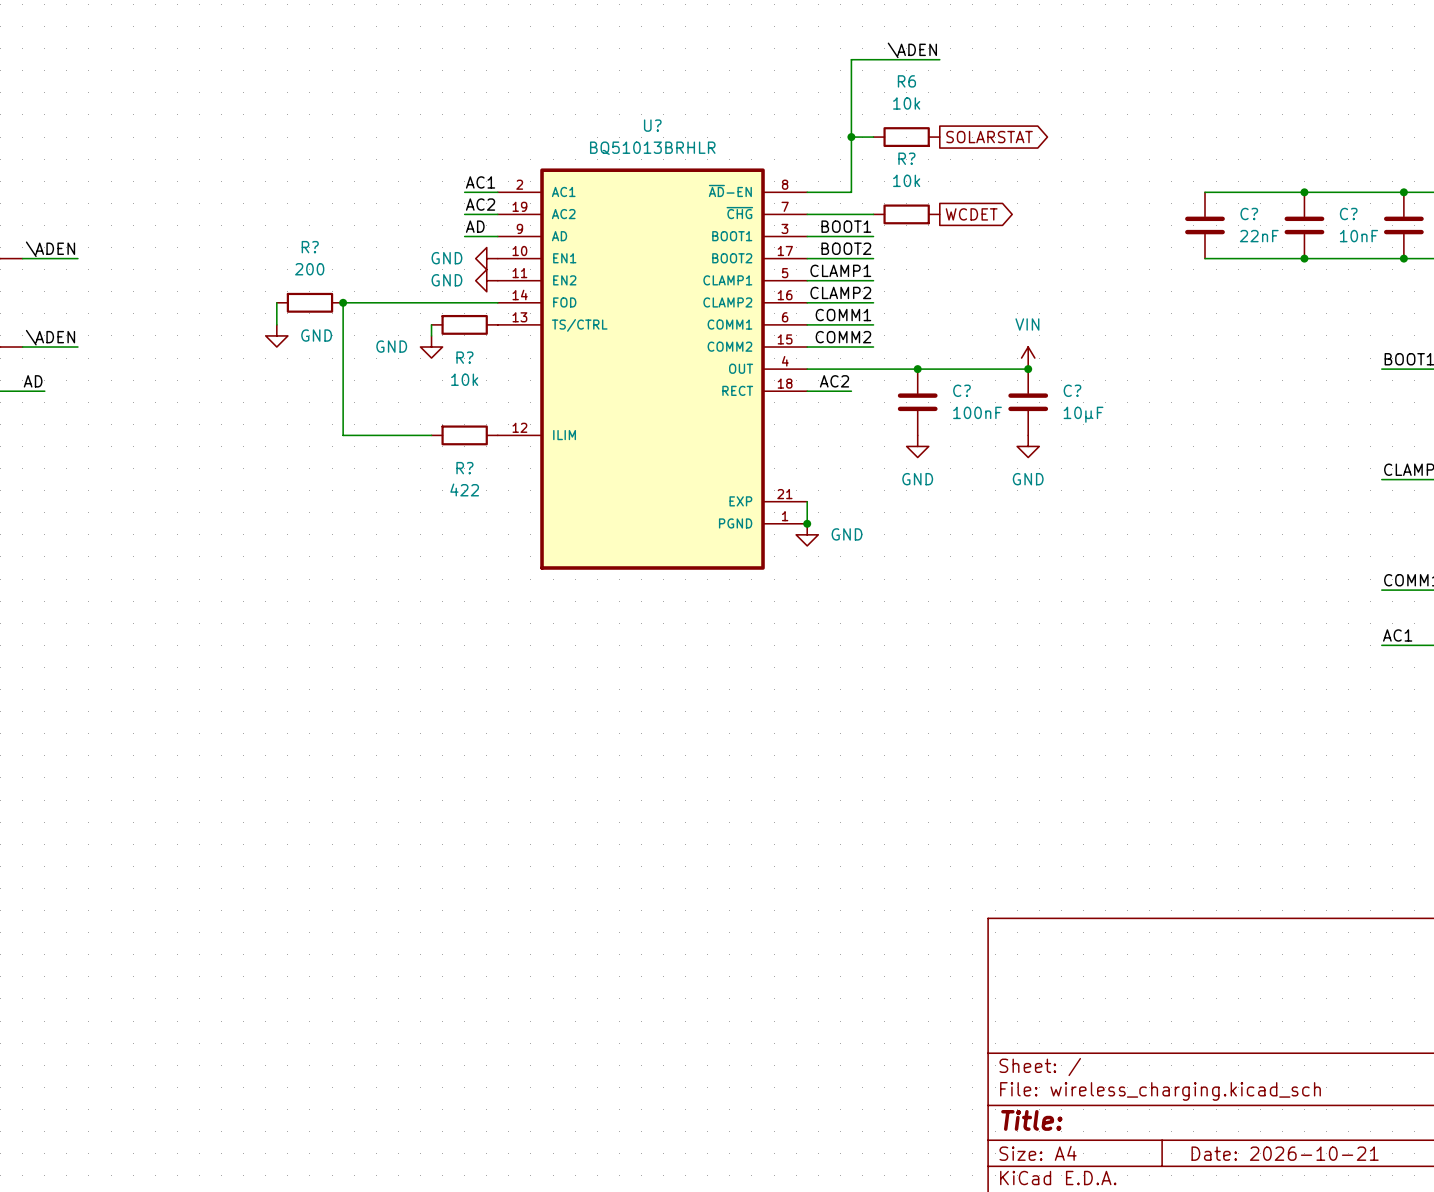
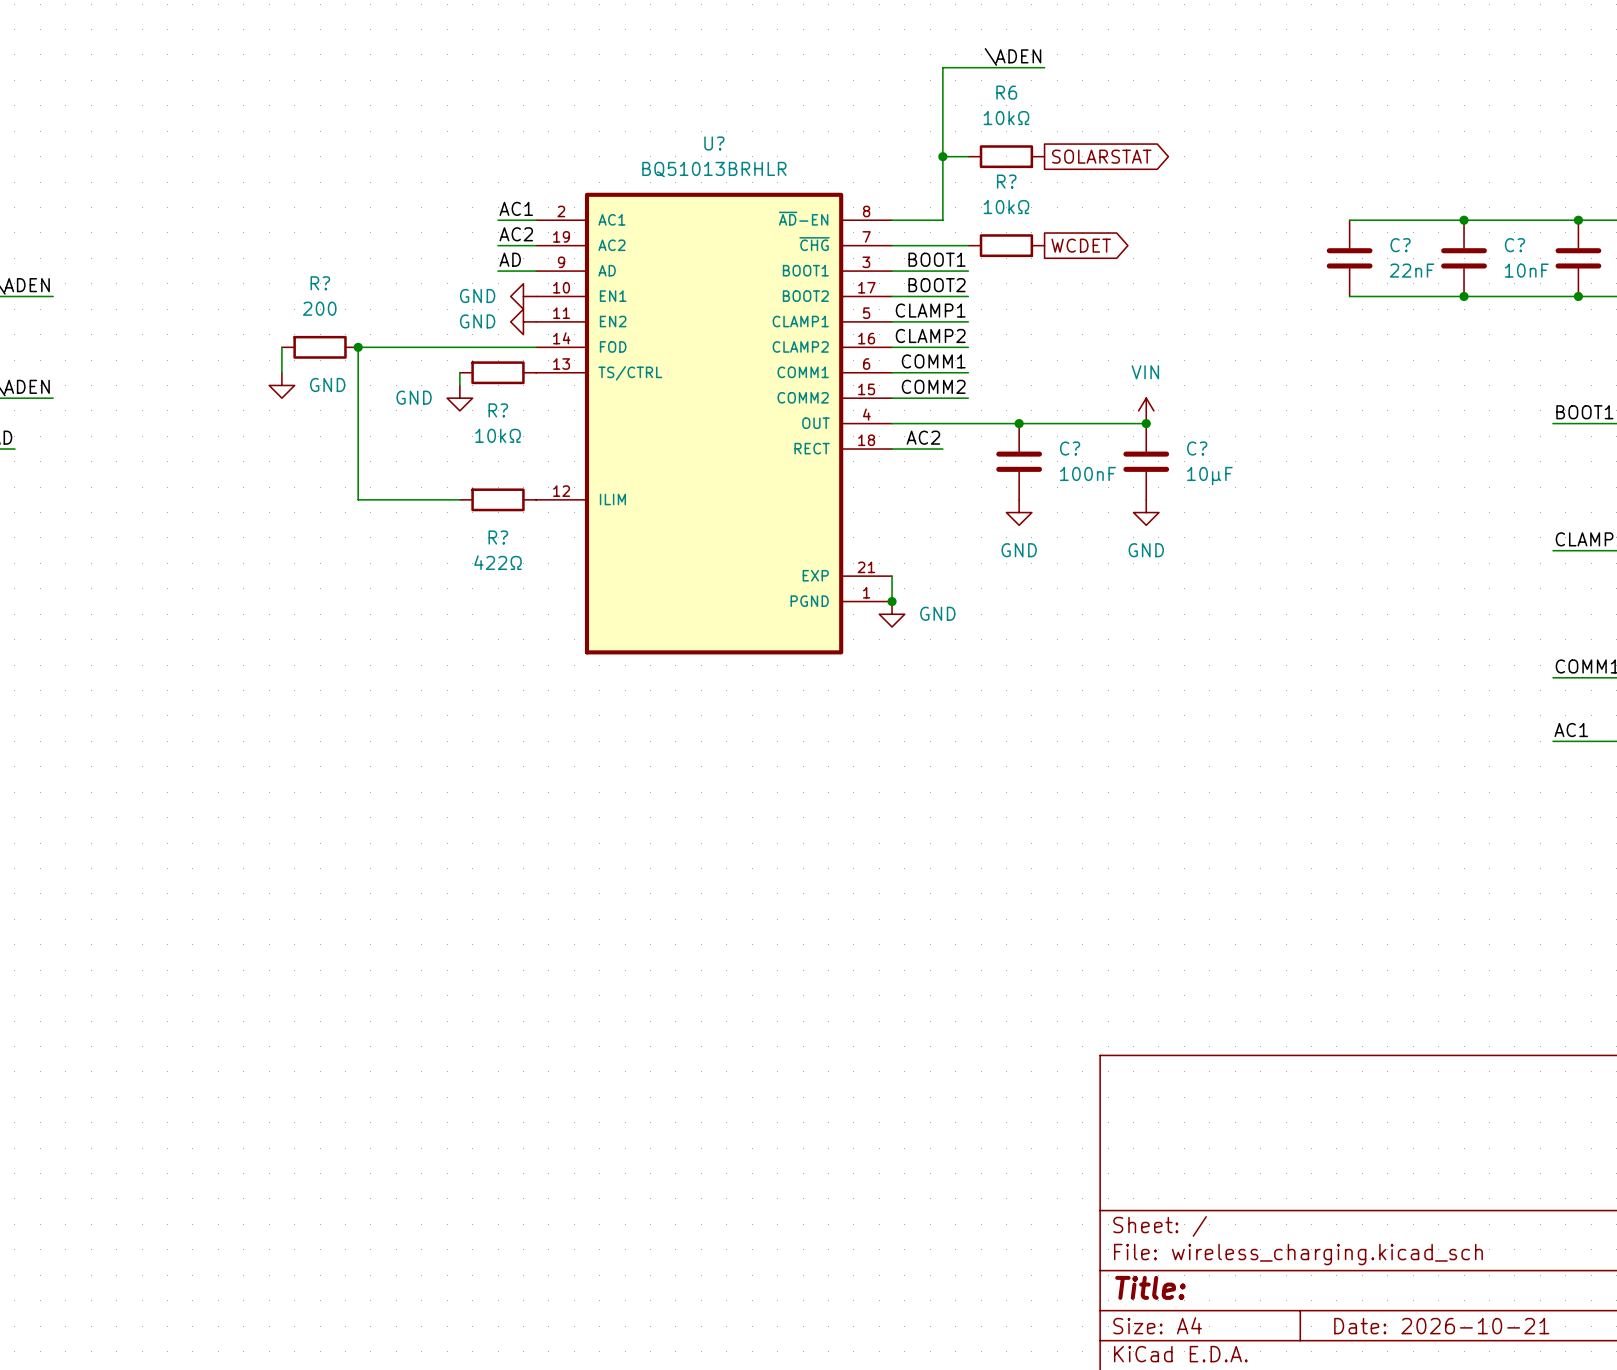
R6 value: 10k (906, 103) -> 10kΩ (1006, 118)
R? value: 10k (906, 180) -> 10kΩ (1006, 207)
R? value: 10k (464, 379) -> 10kΩ (498, 435)
R? value: 422 (464, 489) -> 422Ω (498, 562)

